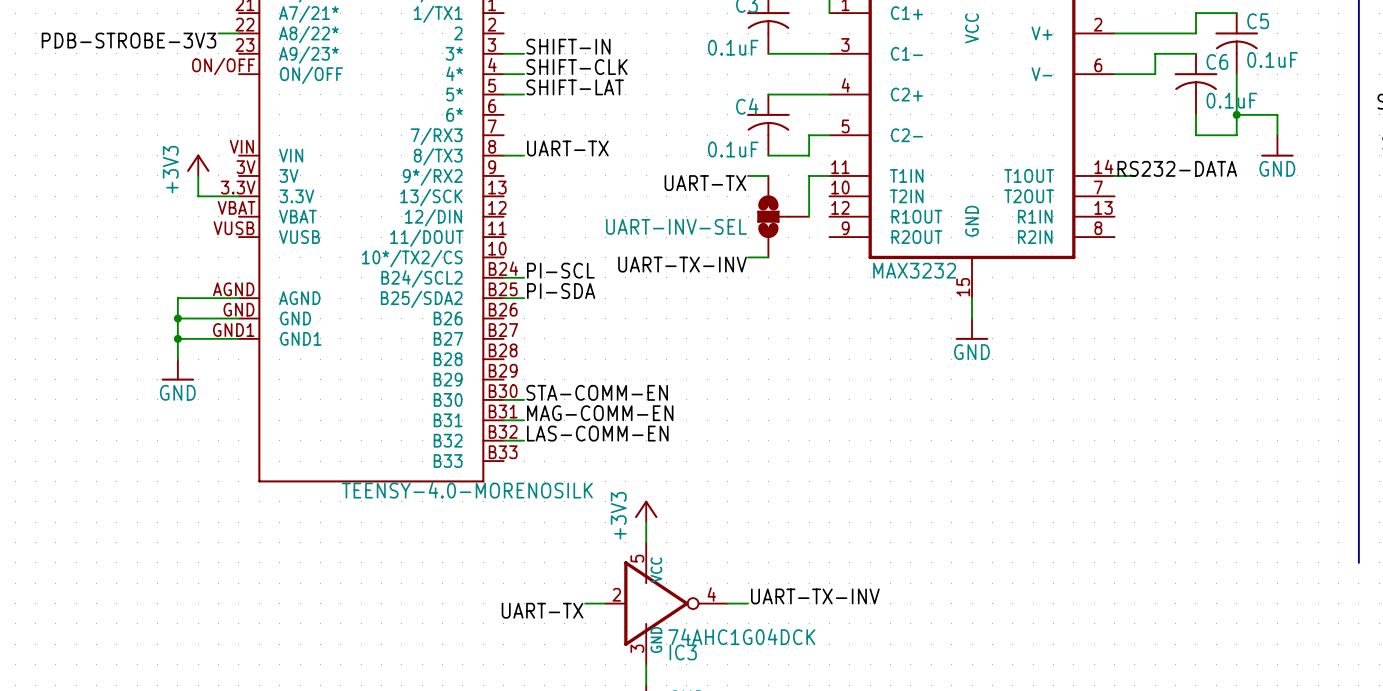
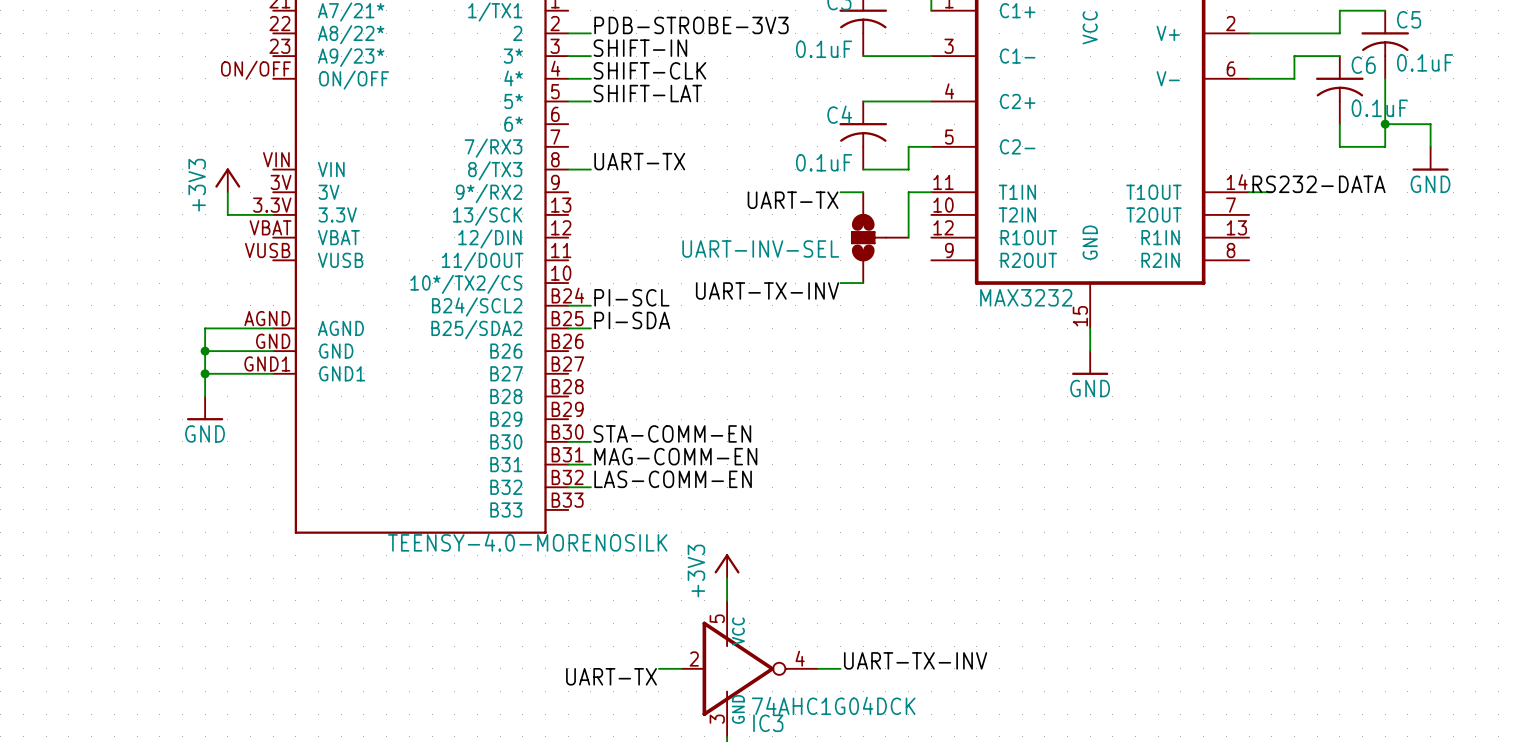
label: none -> PDB-STROBE-3V3 (691, 25)
wire: (218, 33) (238, 33) -> none
wire: none -> (568, 33) (590, 33)
label: PDB-STROBE-3V3 (128, 40) -> none

